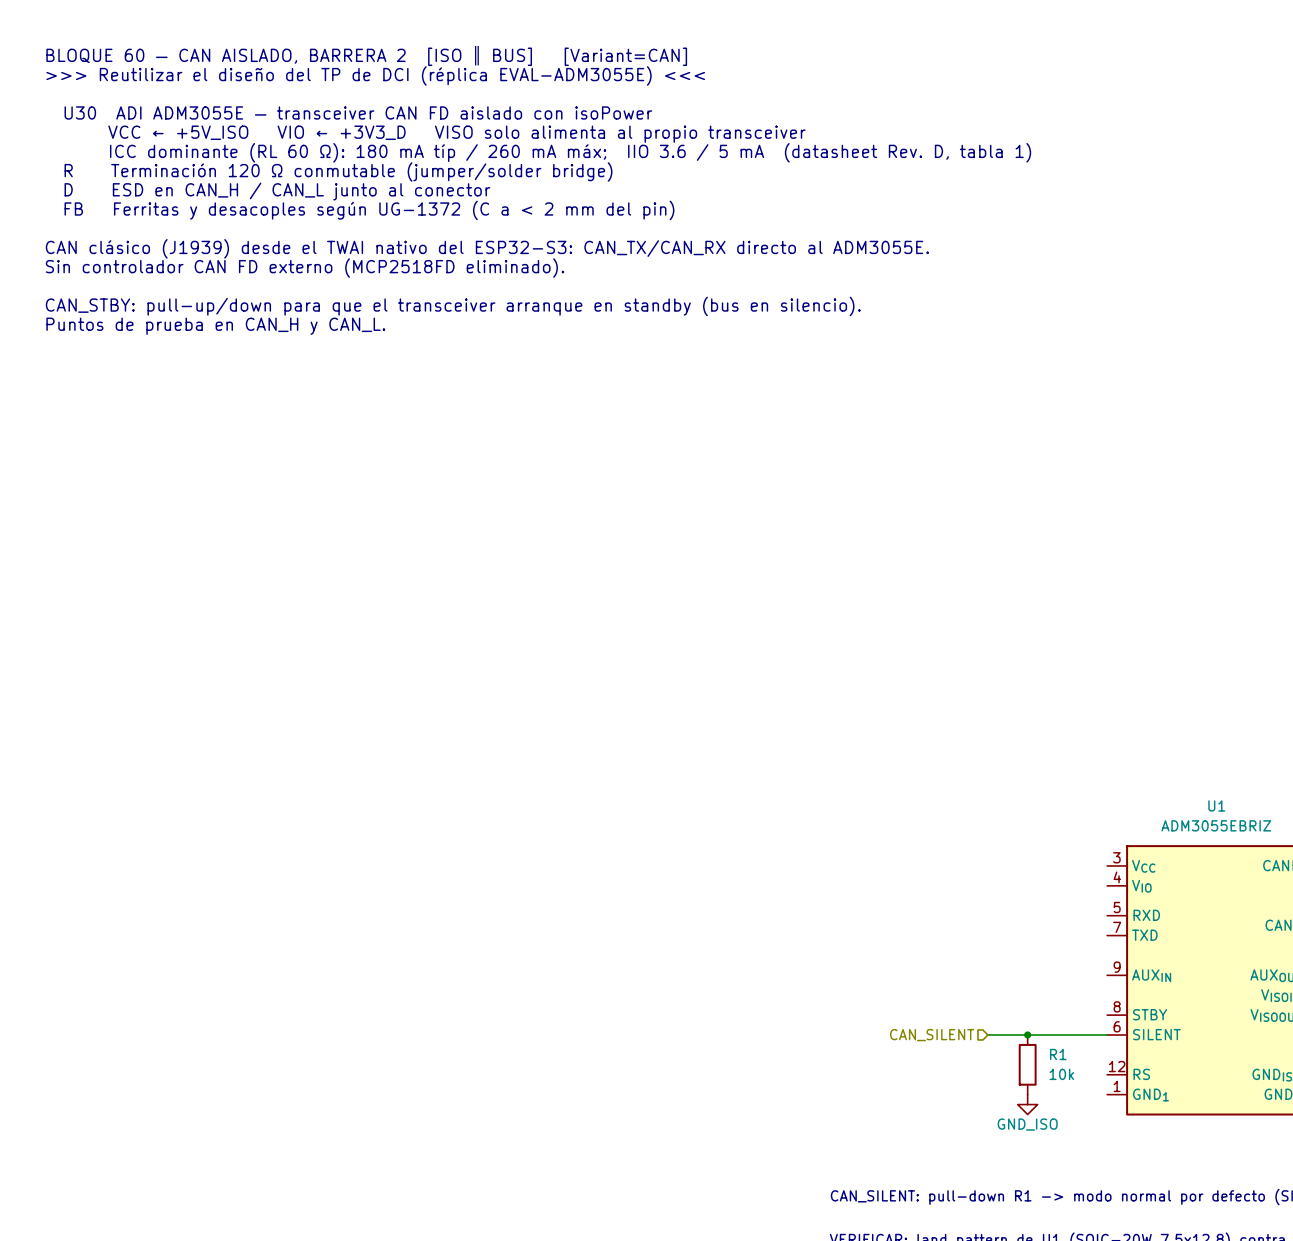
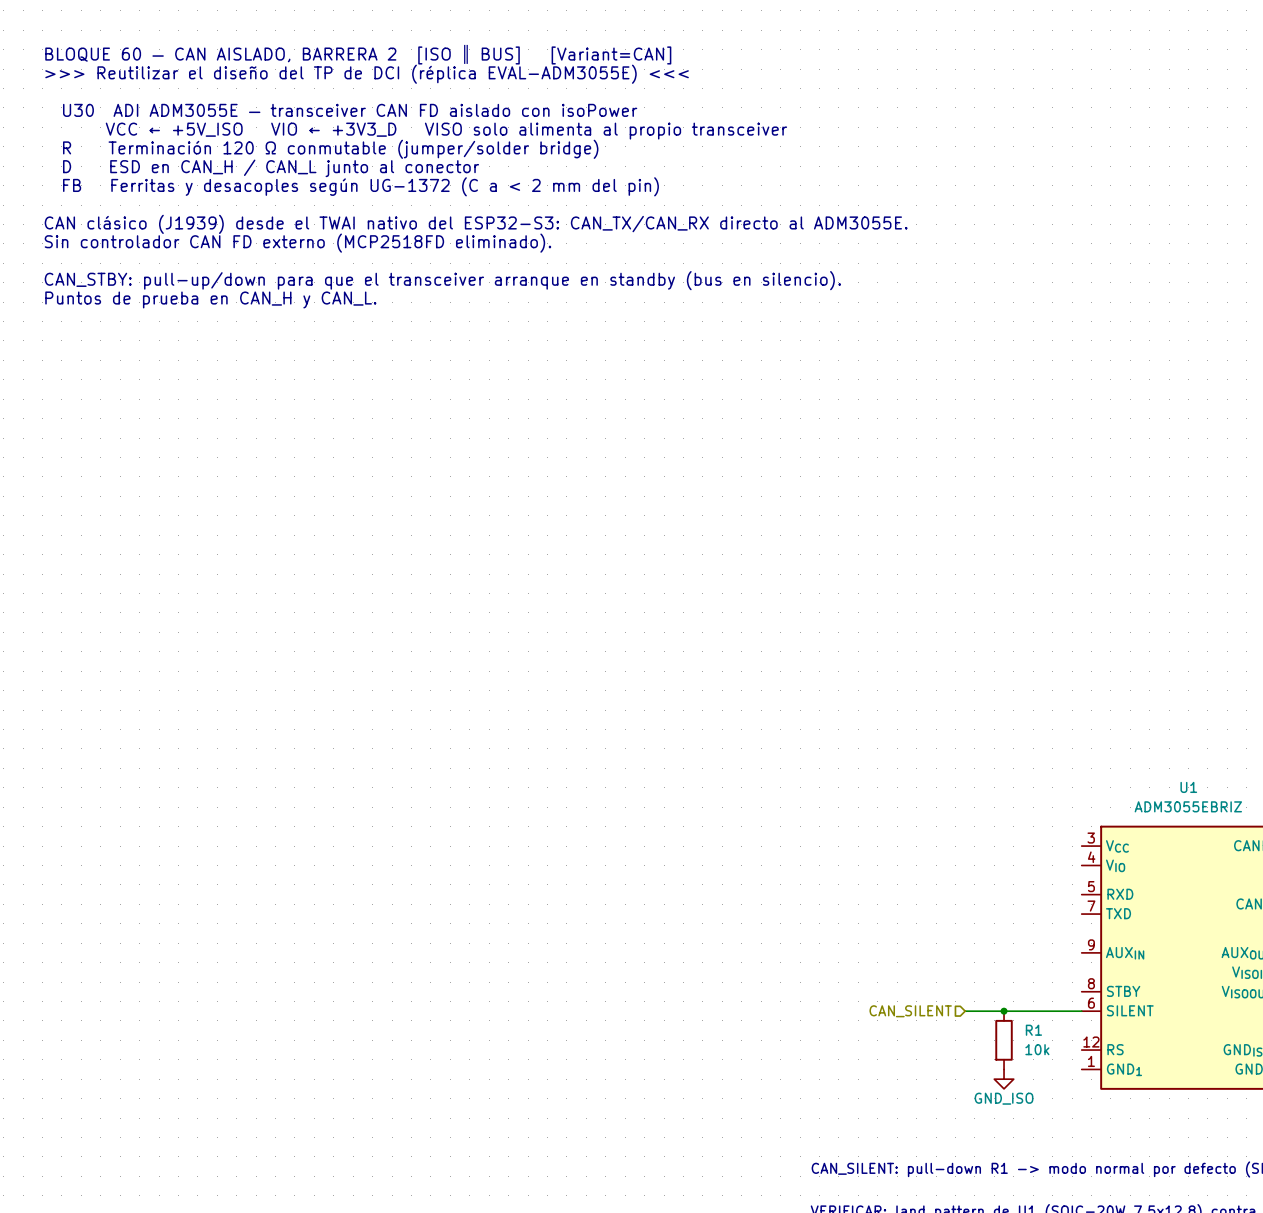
text: ICC dominante (RL 60 Ω): 180 mA típ / 260 mA máx; IIO 3.6 / 5 mA (datasheet Rev. D, tabla 1) (570, 152) -> R Terminación 120 Ω conmutable (jumper/solder bridge) (330, 149)
text: R Terminación 120 Ω conmutable (jumper/solder bridge) (338, 172) -> D ESD en CAN_H / CAN_L junto al conector (271, 168)
text: D ESD en CAN_H / CAN_L junto al conector (277, 191) -> FB Ferritas y desacoples según UG-1372 (C a < 2 mm del pin) (360, 186)
text: FB Ferritas y desacoples según UG-1372 (C a < 2 mm del pin) (369, 210) -> none
text: none -> CAN clásico (J1939) desde el TWAI nativo del ESP32-S3: CAN_TX/CAN_RX directo al ADM3055E. (476, 224)
text: CAN clásico (J1939) desde el TWAI nativo del ESP32-S3: CAN_TX/CAN_RX directo al ADM3055E. (487, 248) -> Sin controlador CAN FD externo (MCP2518FD eliminado). (297, 243)
text: Sin controlador CAN FD externo (MCP2518FD eliminado). (304, 268) -> none
text: none -> CAN_STBY: pull-up/down para que el transceiver arranque en standby (bus en silencio). (442, 280)
text: CAN_STBY: pull-up/down para que el transceiver arranque en standby (bus en silencio). (453, 306) -> Puntos de prueba en CAN_H y CAN_L. (210, 299)
text: Puntos de prueba en CAN_H y CAN_L. (215, 326) -> none

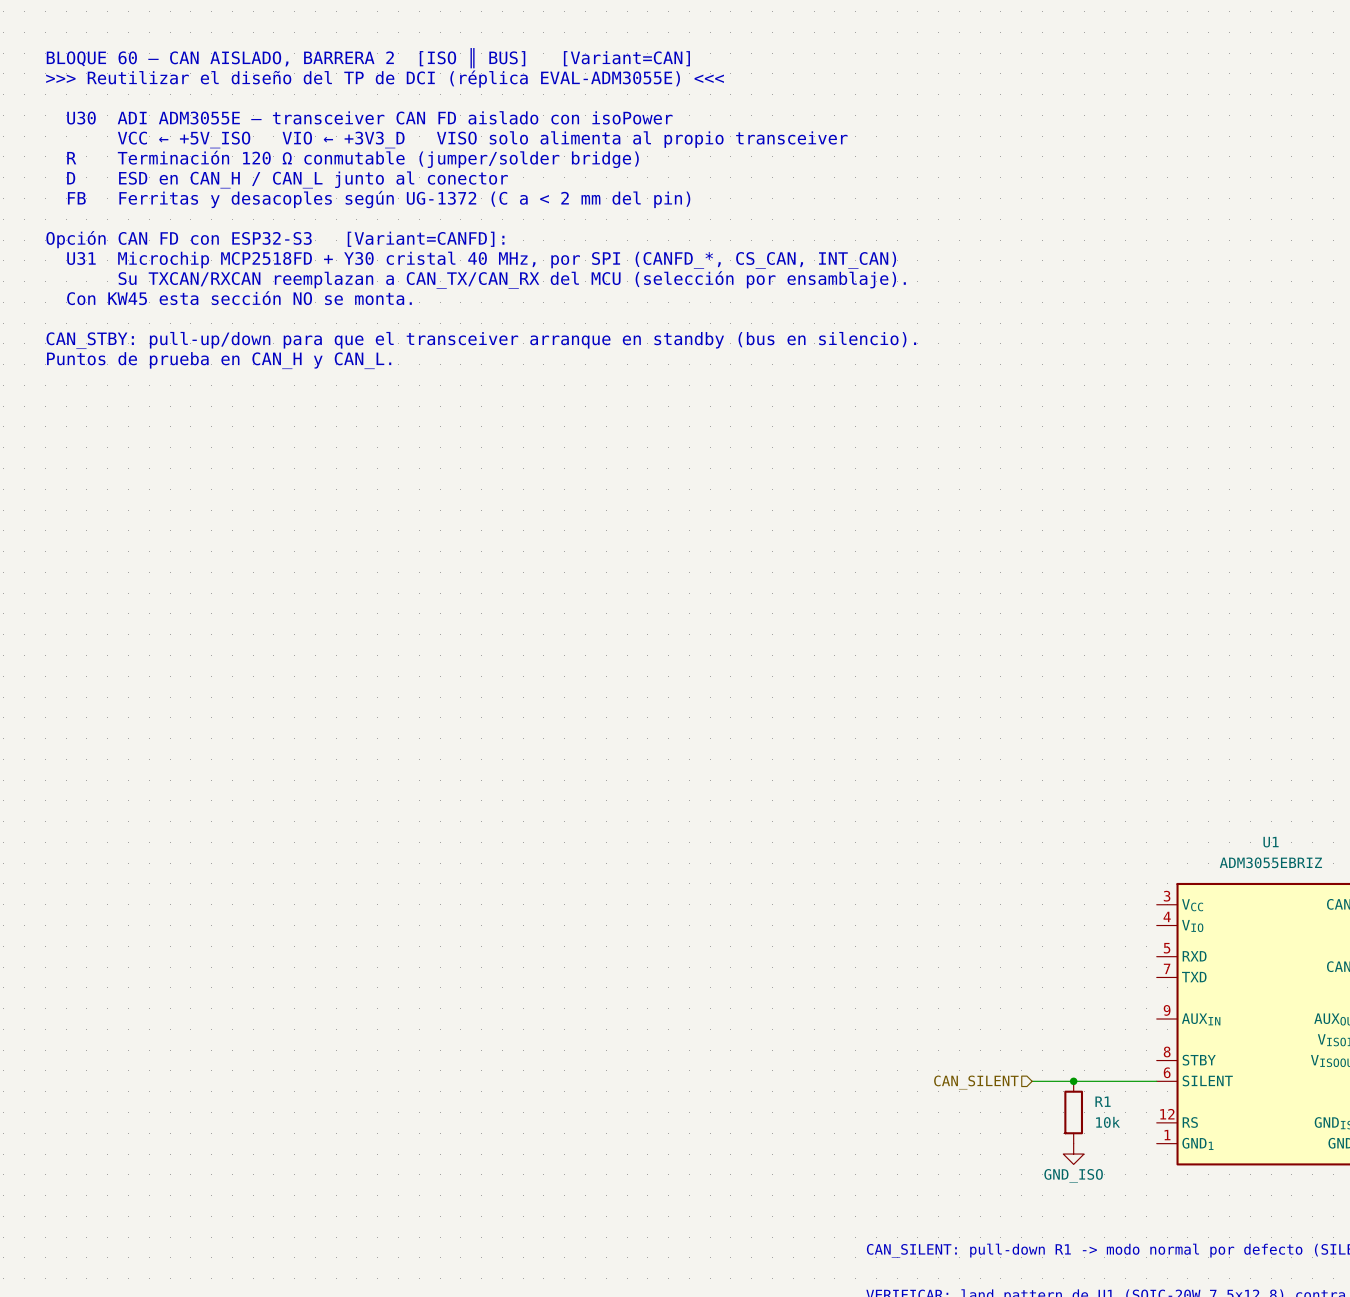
text: CAN clásico (J1939) desde el TWAI nativo del ESP32-S3: CAN_TX/CAN_RX directo al ADM3055E. (476, 224) -> Opción CAN FD con ESP32-S3 [Variant=CANFD]: (275, 239)
text: Sin controlador CAN FD externo (MCP2518FD eliminado). (297, 243) -> U31 Microchip MCP2518FD + Y30 cristal 40 MHz, por SPI (CANFD_*, CS_CAN, INT_CAN) (481, 260)
text: none -> Su TXCAN/RXCAN reemplazan a CAN_TX/CAN_RX del MCU (selección por ensamblaje). (512, 279)
text: CAN_STBY: pull-up/down para que el transceiver arranque en standby (bus en silencio). (442, 280) -> Con KW45 esta sección NO se monta. (239, 298)
text position: Puntos de prueba en CAN_H y CAN_L. (210, 299) -> Puntos de prueba en CAN_H y CAN_L. (219, 360)
text: none -> CAN_STBY: pull-up/down para que el transceiver arranque en standby (bus en silencio). (481, 340)

